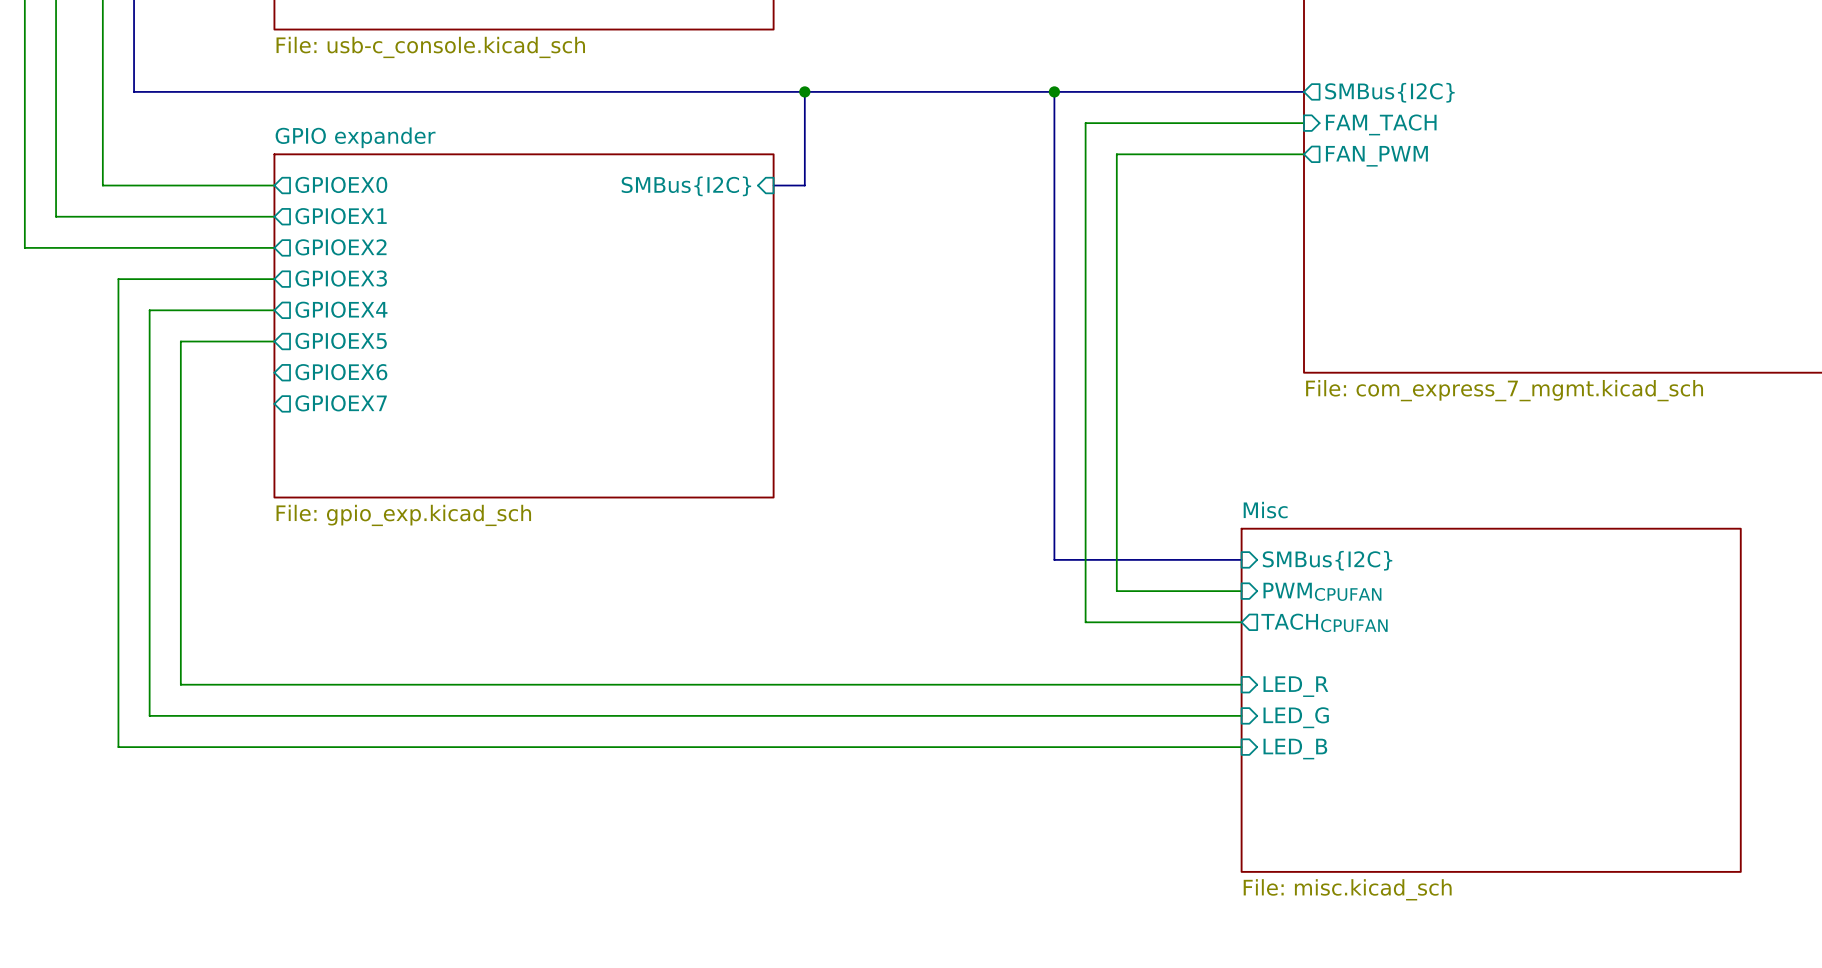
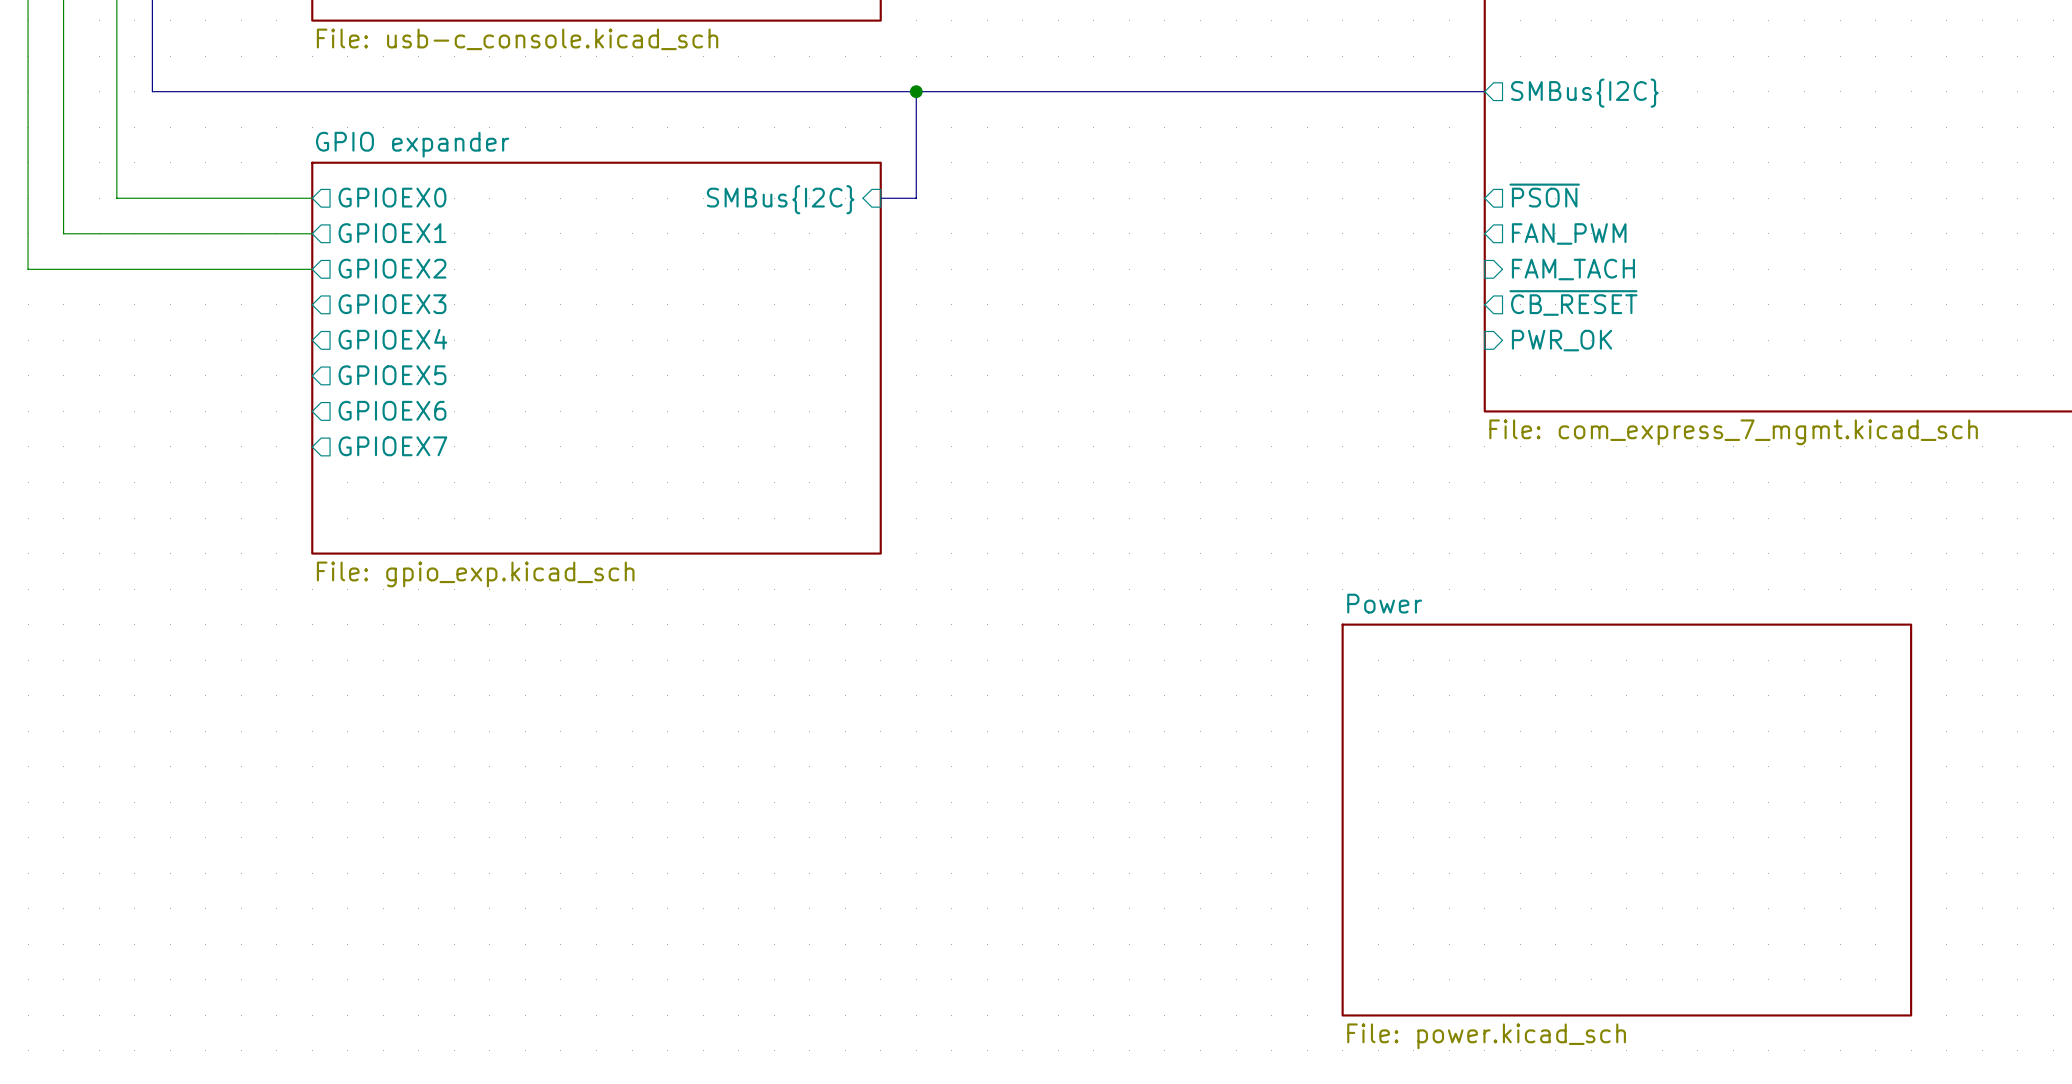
bus: (1054, 91) (1054, 559) (1241, 559) -> none
junction: (1054, 91) -> none
wire: (1304, 123) (1085, 123) (1085, 622) (1241, 622) -> none
sheet pin position: FAM_TACH (1381, 124) -> FAM_TACH (1573, 269)
wire: (1304, 154) (1116, 154) (1116, 591) (1241, 591) -> none
sheet pin position: FAN_PWM (1376, 156) -> FAN_PWM (1569, 233)
sheet pin: none -> ~{PSON} (1544, 195)
wire: (274, 279) (118, 279) (118, 747) (1241, 747) -> none
sheet pin: none -> ~{CB_RESET} (1573, 302)
wire: (274, 310) (149, 310) (149, 715) (1241, 715) -> none
sheet pin: none -> PWR_OK (1562, 340)
wire: (274, 341) (180, 341) (180, 684) (1241, 684) -> none
sheet pin: SMBus{I2C} (1327, 560) -> none
sheet pin: PWMCPUFAN (1322, 591) -> none
sheet pin: TACHCPUFAN (1324, 622) -> none
sheet pin: LED_R (1295, 686) -> none
sheet Misc: File: misc.kicad_sch (1491, 700) -> none
sheet pin: LED_G (1296, 717) -> none
sheet Power: none -> File: power.kicad_sch (1626, 820)
sheet pin: LED_B (1295, 749) -> none

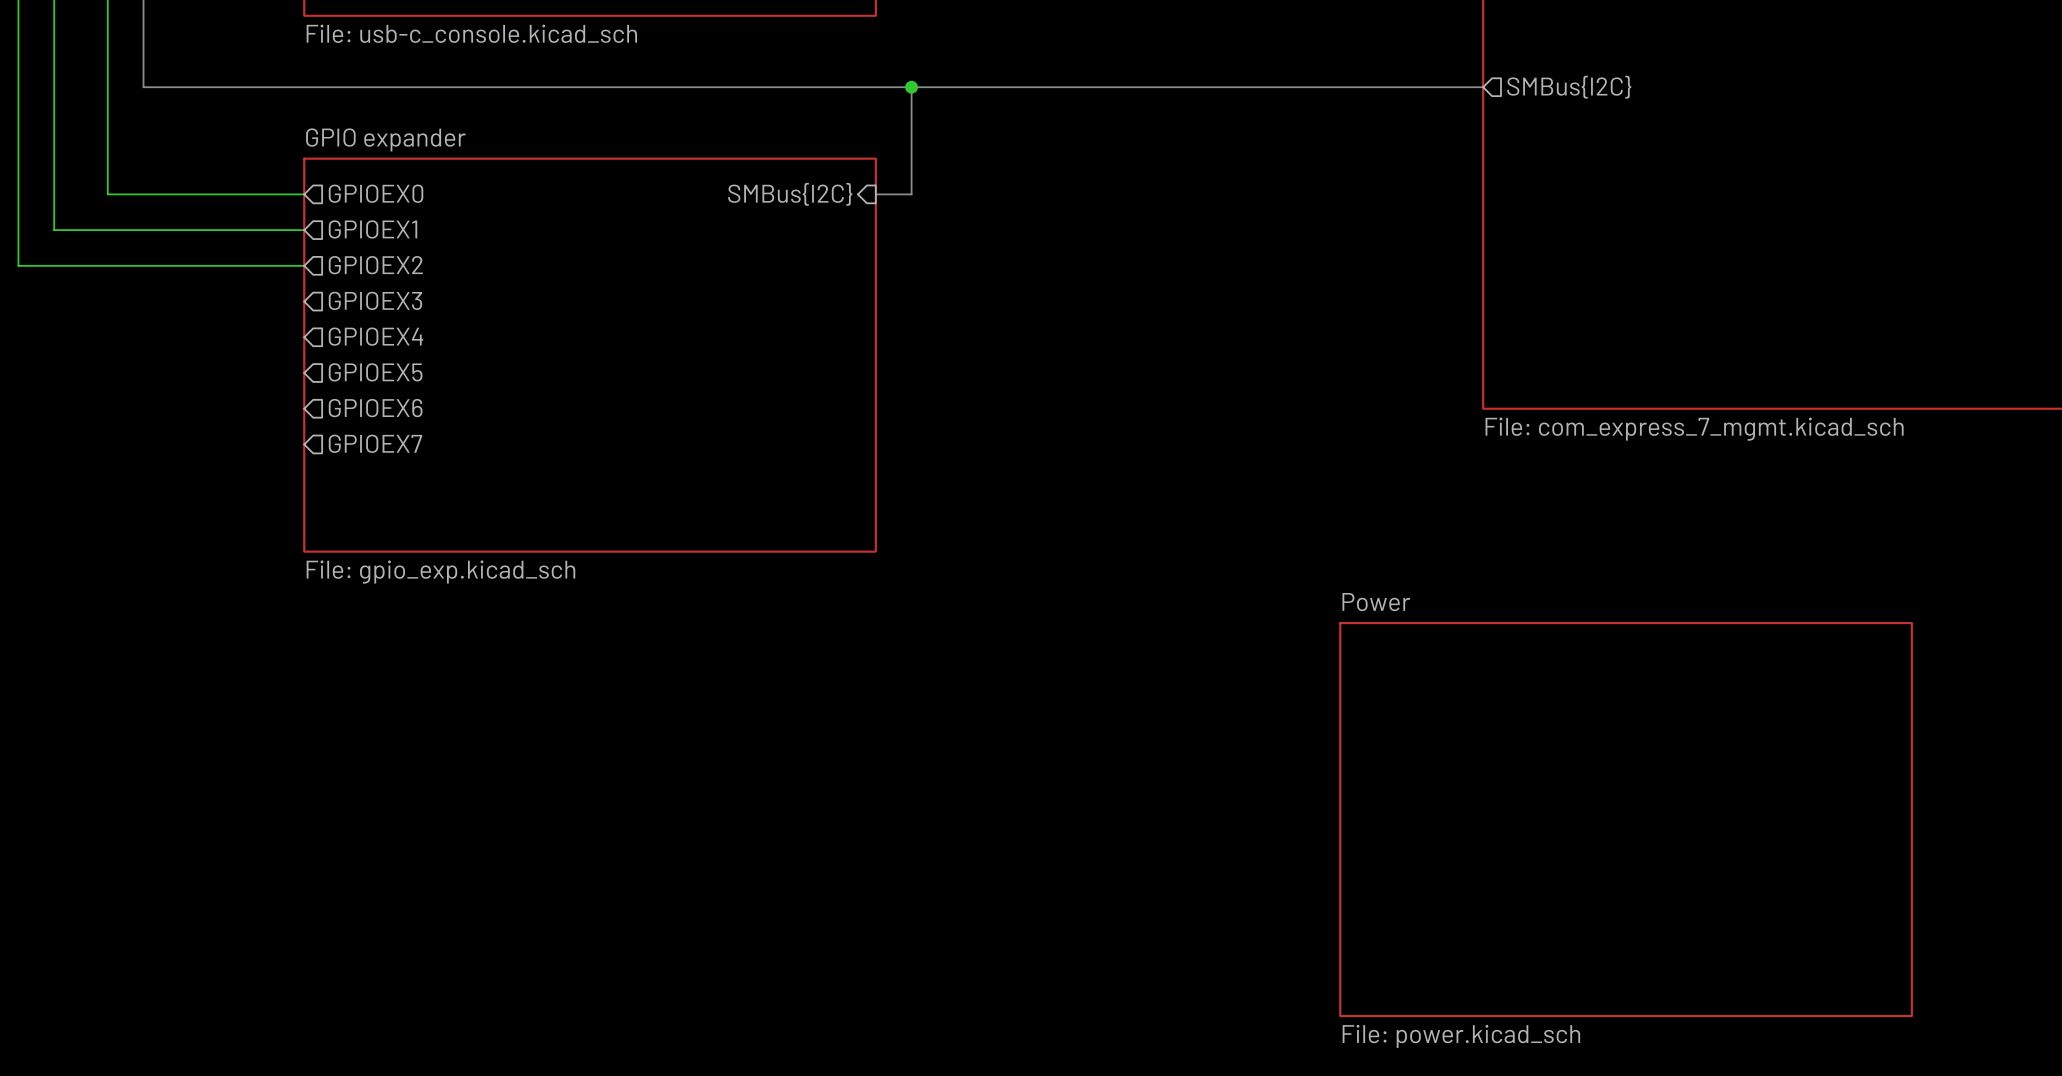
sheet pin: ~{PSON} (1544, 195) -> none
sheet pin: FAN_PWM (1569, 233) -> none
sheet pin: FAM_TACH (1573, 269) -> none
sheet pin: ~{CB_RESET} (1573, 302) -> none
sheet pin: PWR_OK (1562, 340) -> none

